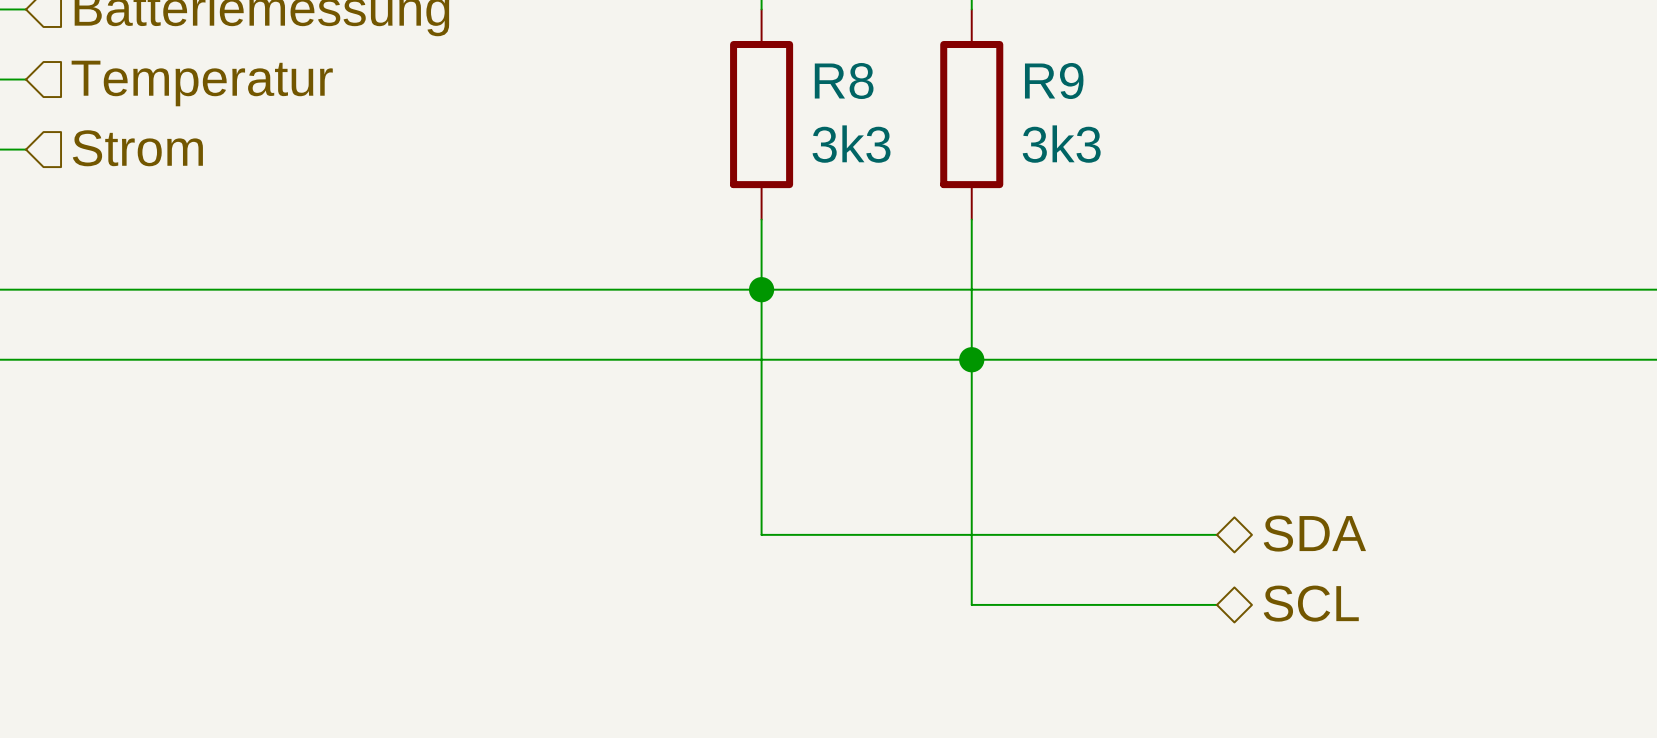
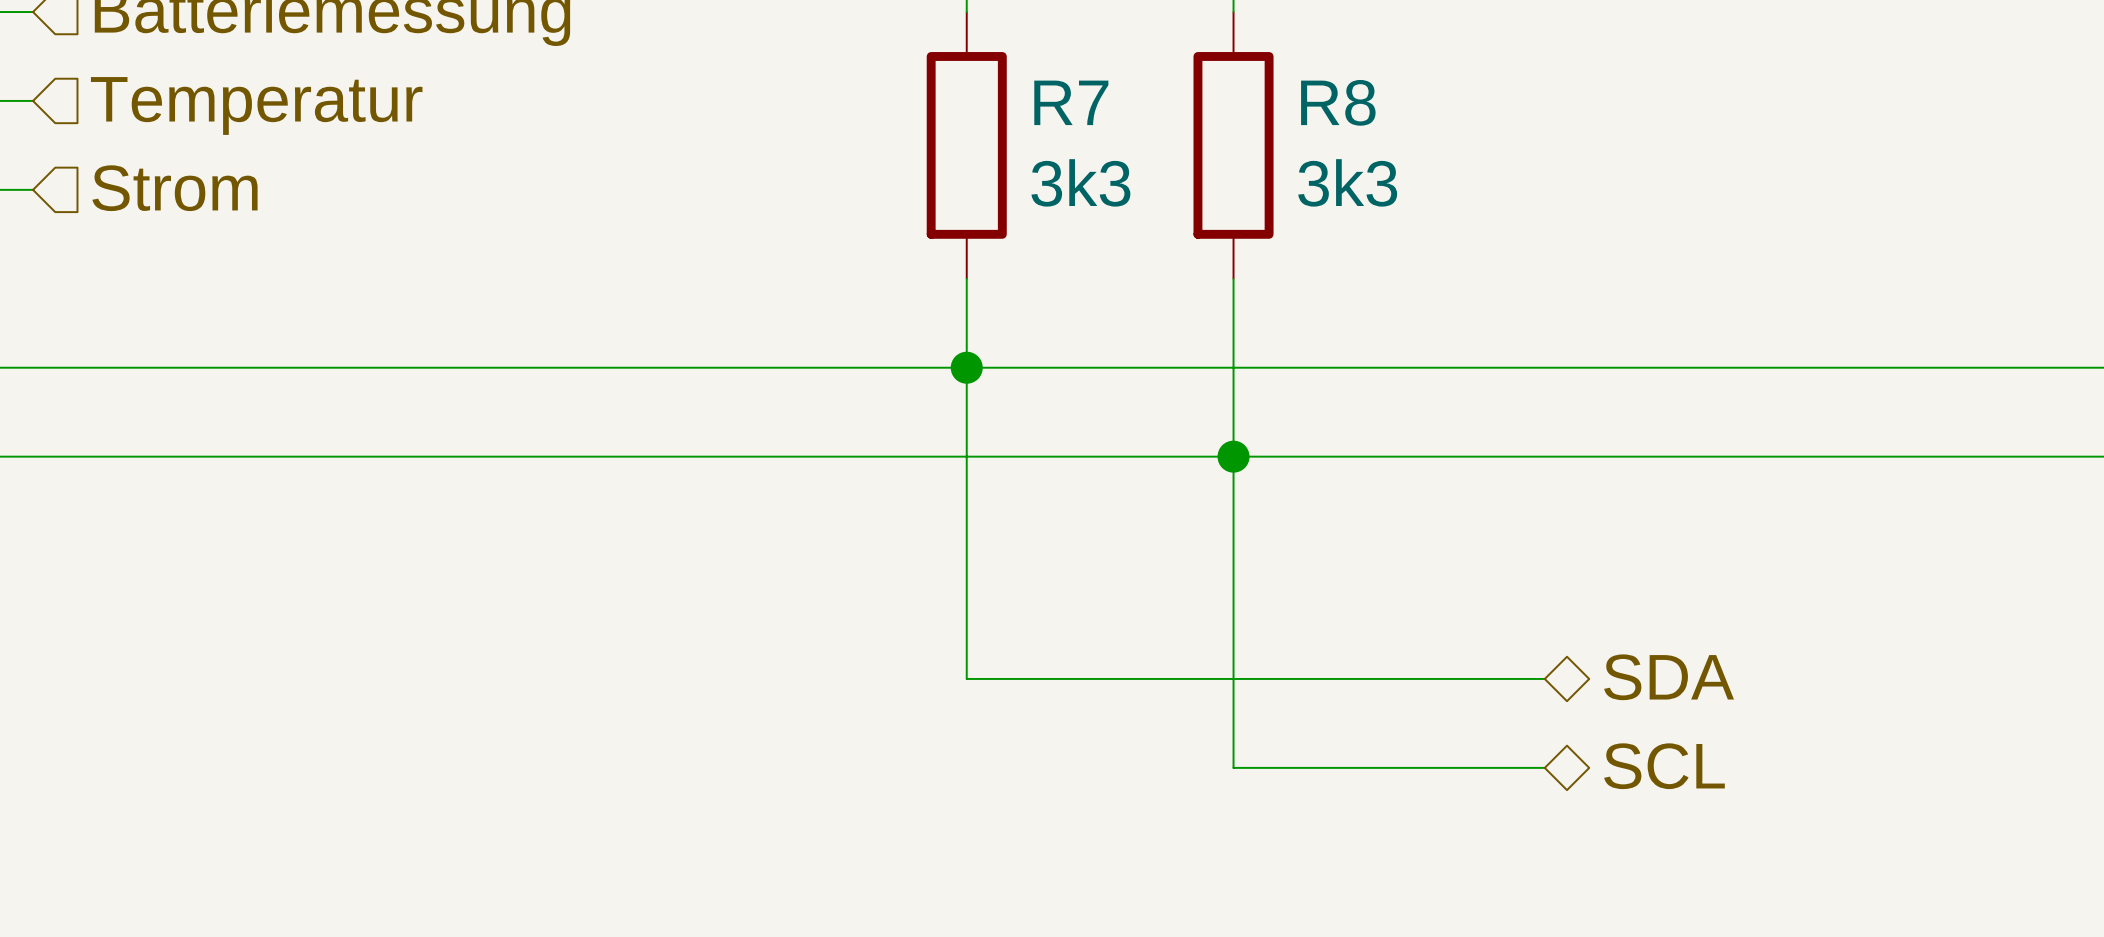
R8 name: R8 (844, 81) -> R7 (1071, 102)
R9 name: R9 (1054, 81) -> R8 (1338, 102)

